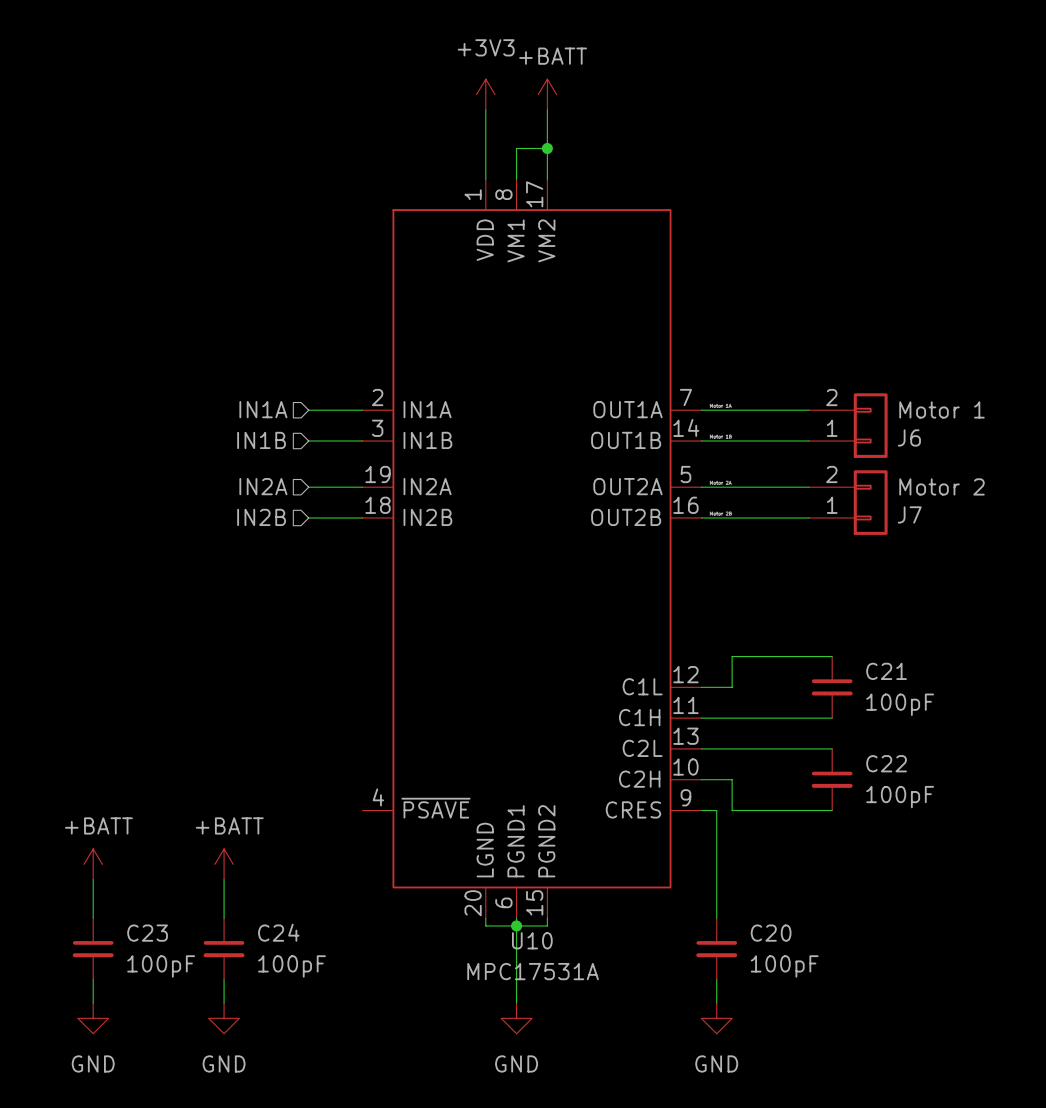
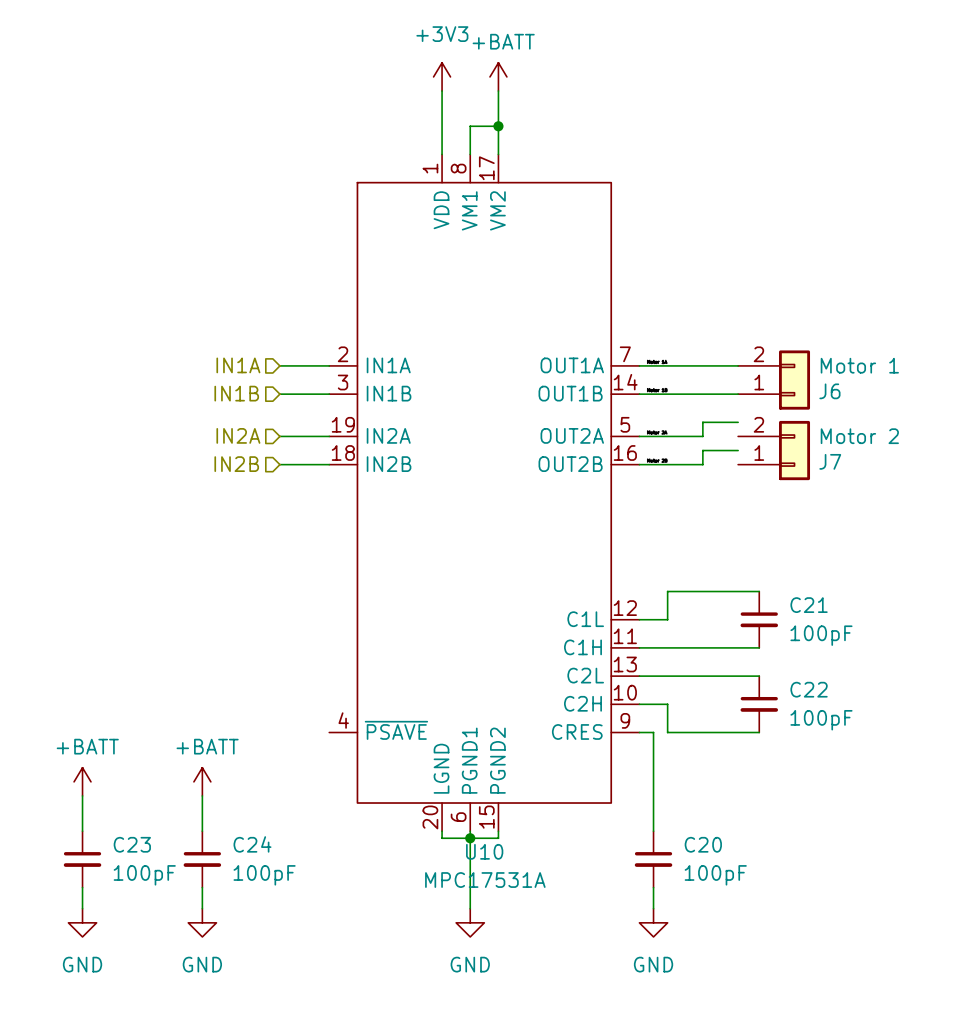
wire: (770, 487) (809, 487) -> (702, 436) (702, 422) (738, 422)
wire: (770, 517) (809, 517) -> (702, 464) (702, 450) (738, 450)

